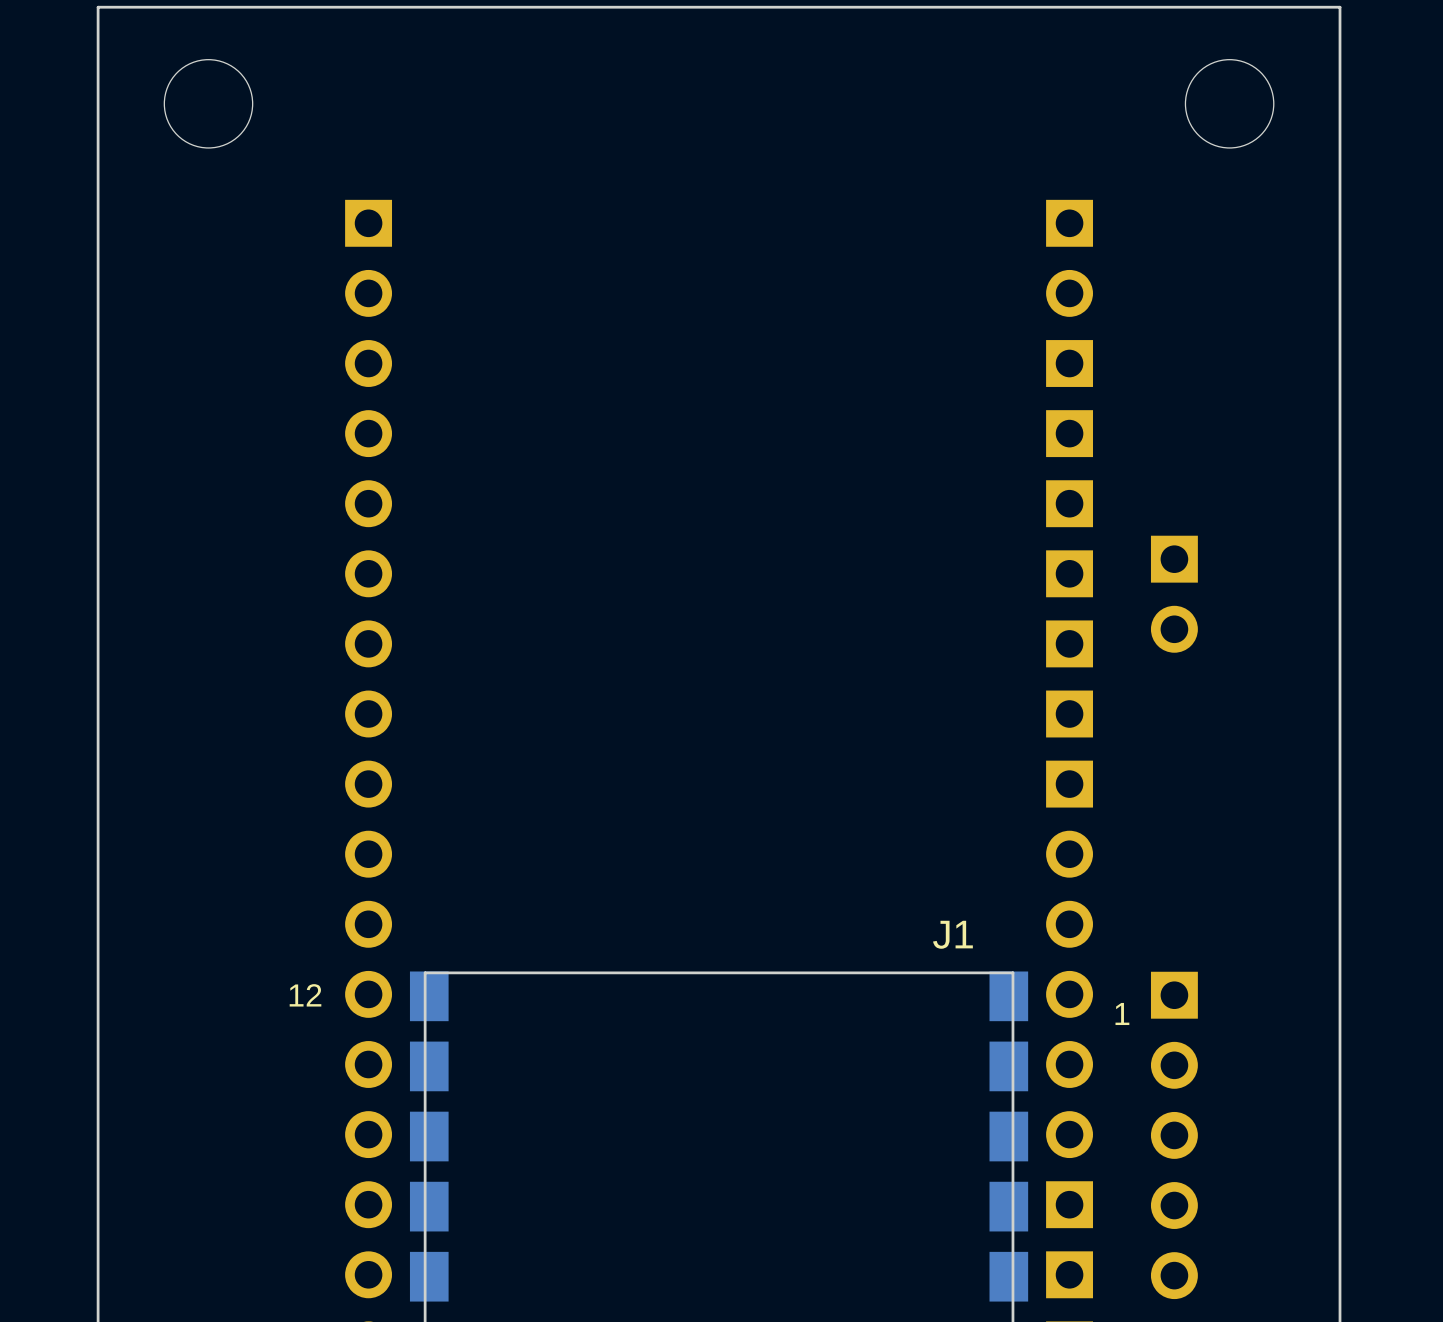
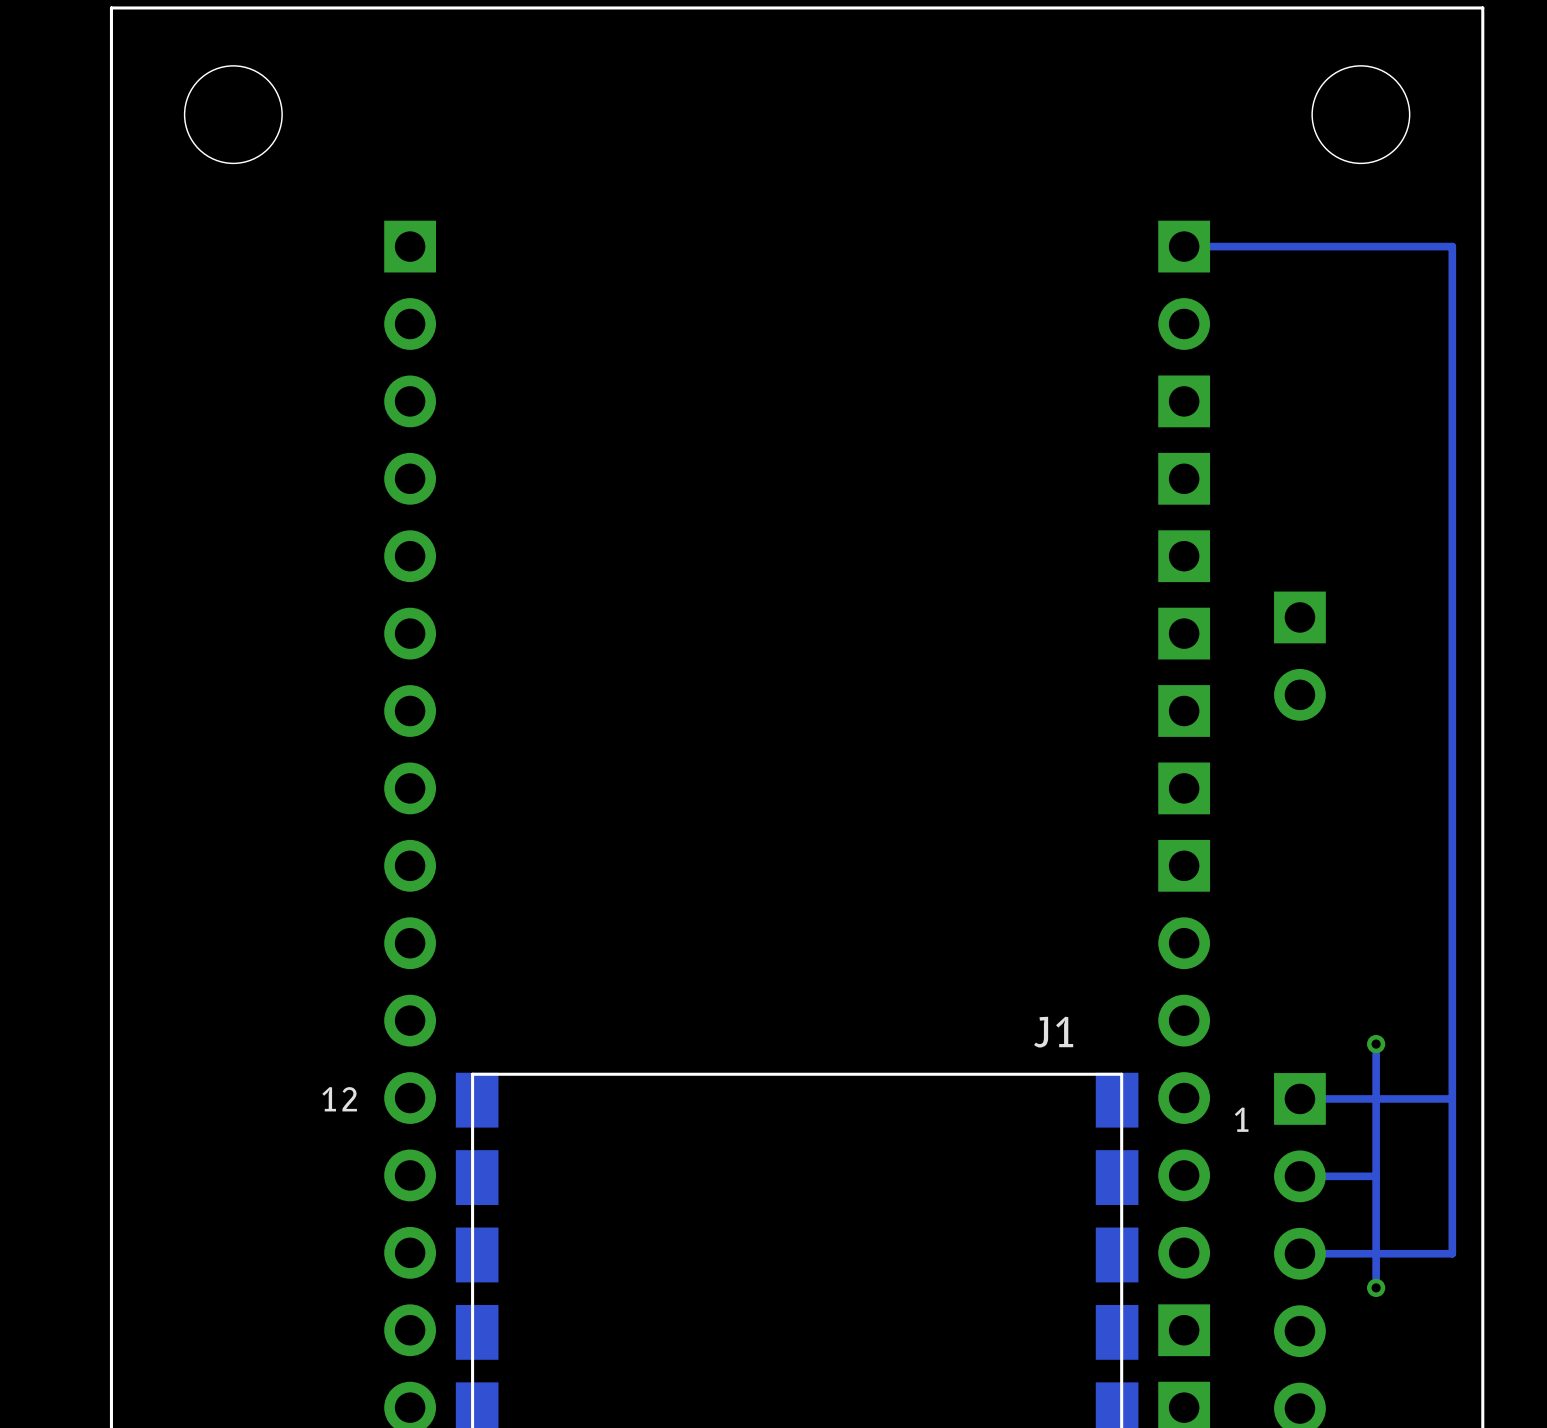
track: none -> (1184, 246) (1452, 246) (1452, 1253) (1299, 1253)
track: none -> (1376, 1044) (1376, 1287)
via: none -> (1376, 1044)
track: none -> (1452, 1098) (1299, 1098)
track: none -> (1376, 1176) (1299, 1176)
via: none -> (1376, 1287)

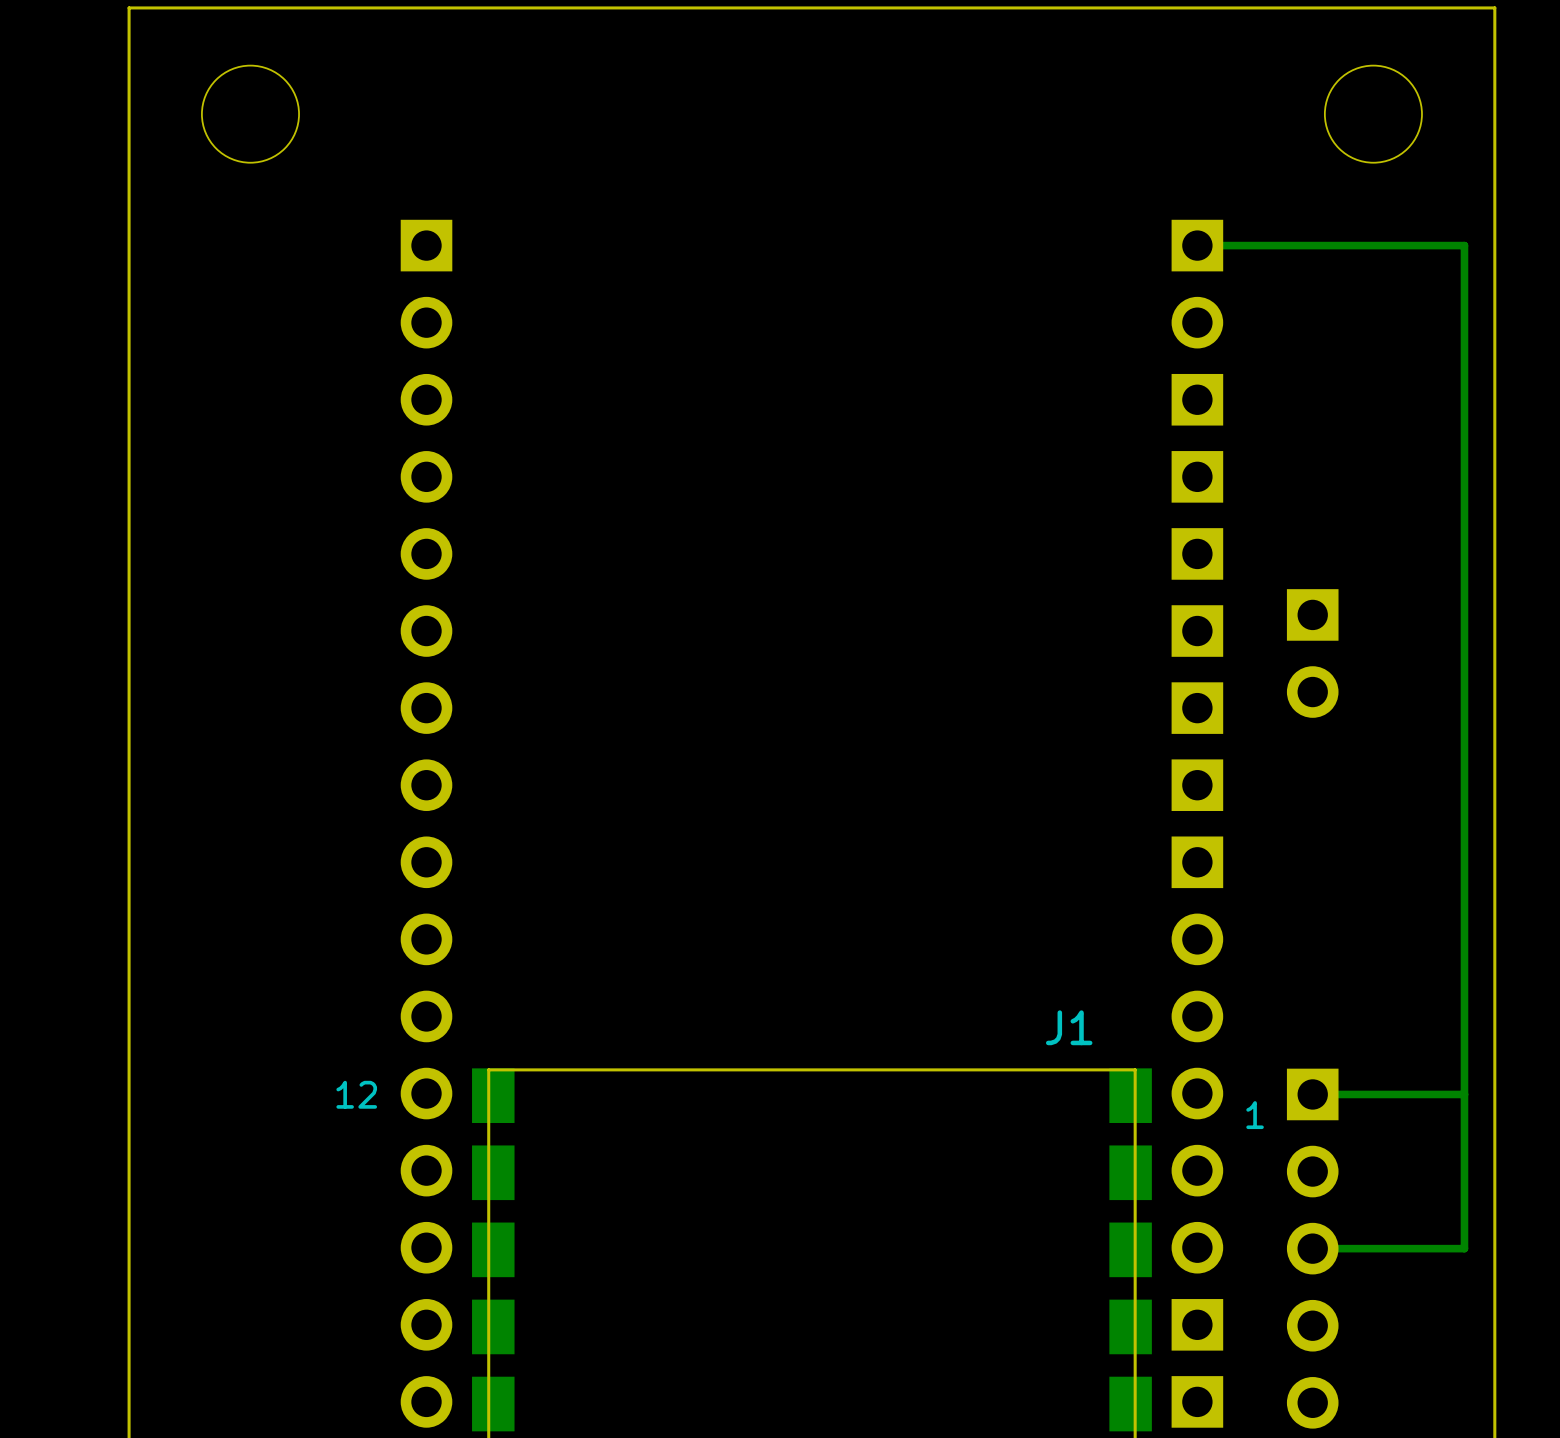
track: (1376, 1044) (1376, 1287) -> none
via: (1376, 1044) -> none
track: (1376, 1176) (1299, 1176) -> none
via: (1376, 1287) -> none

